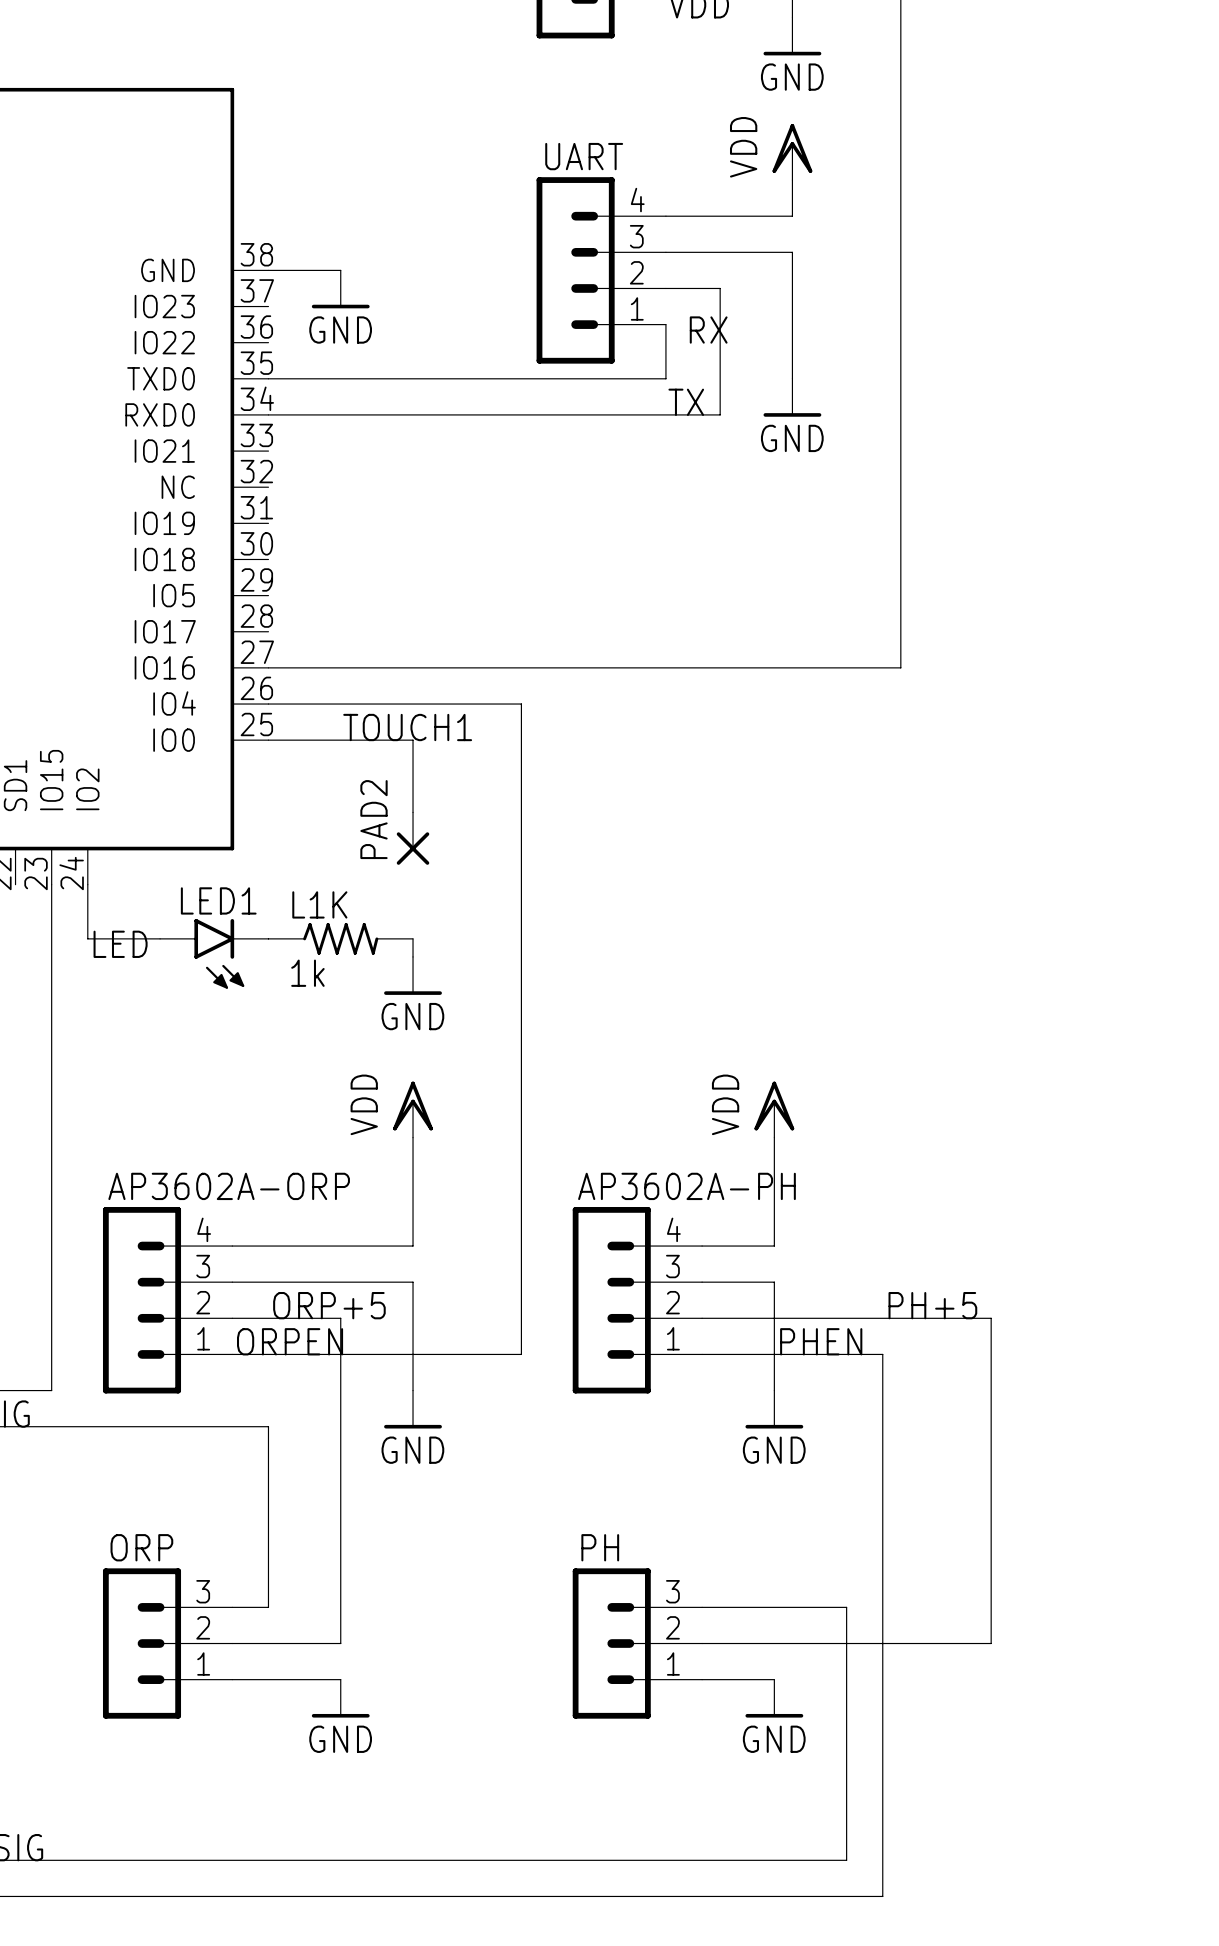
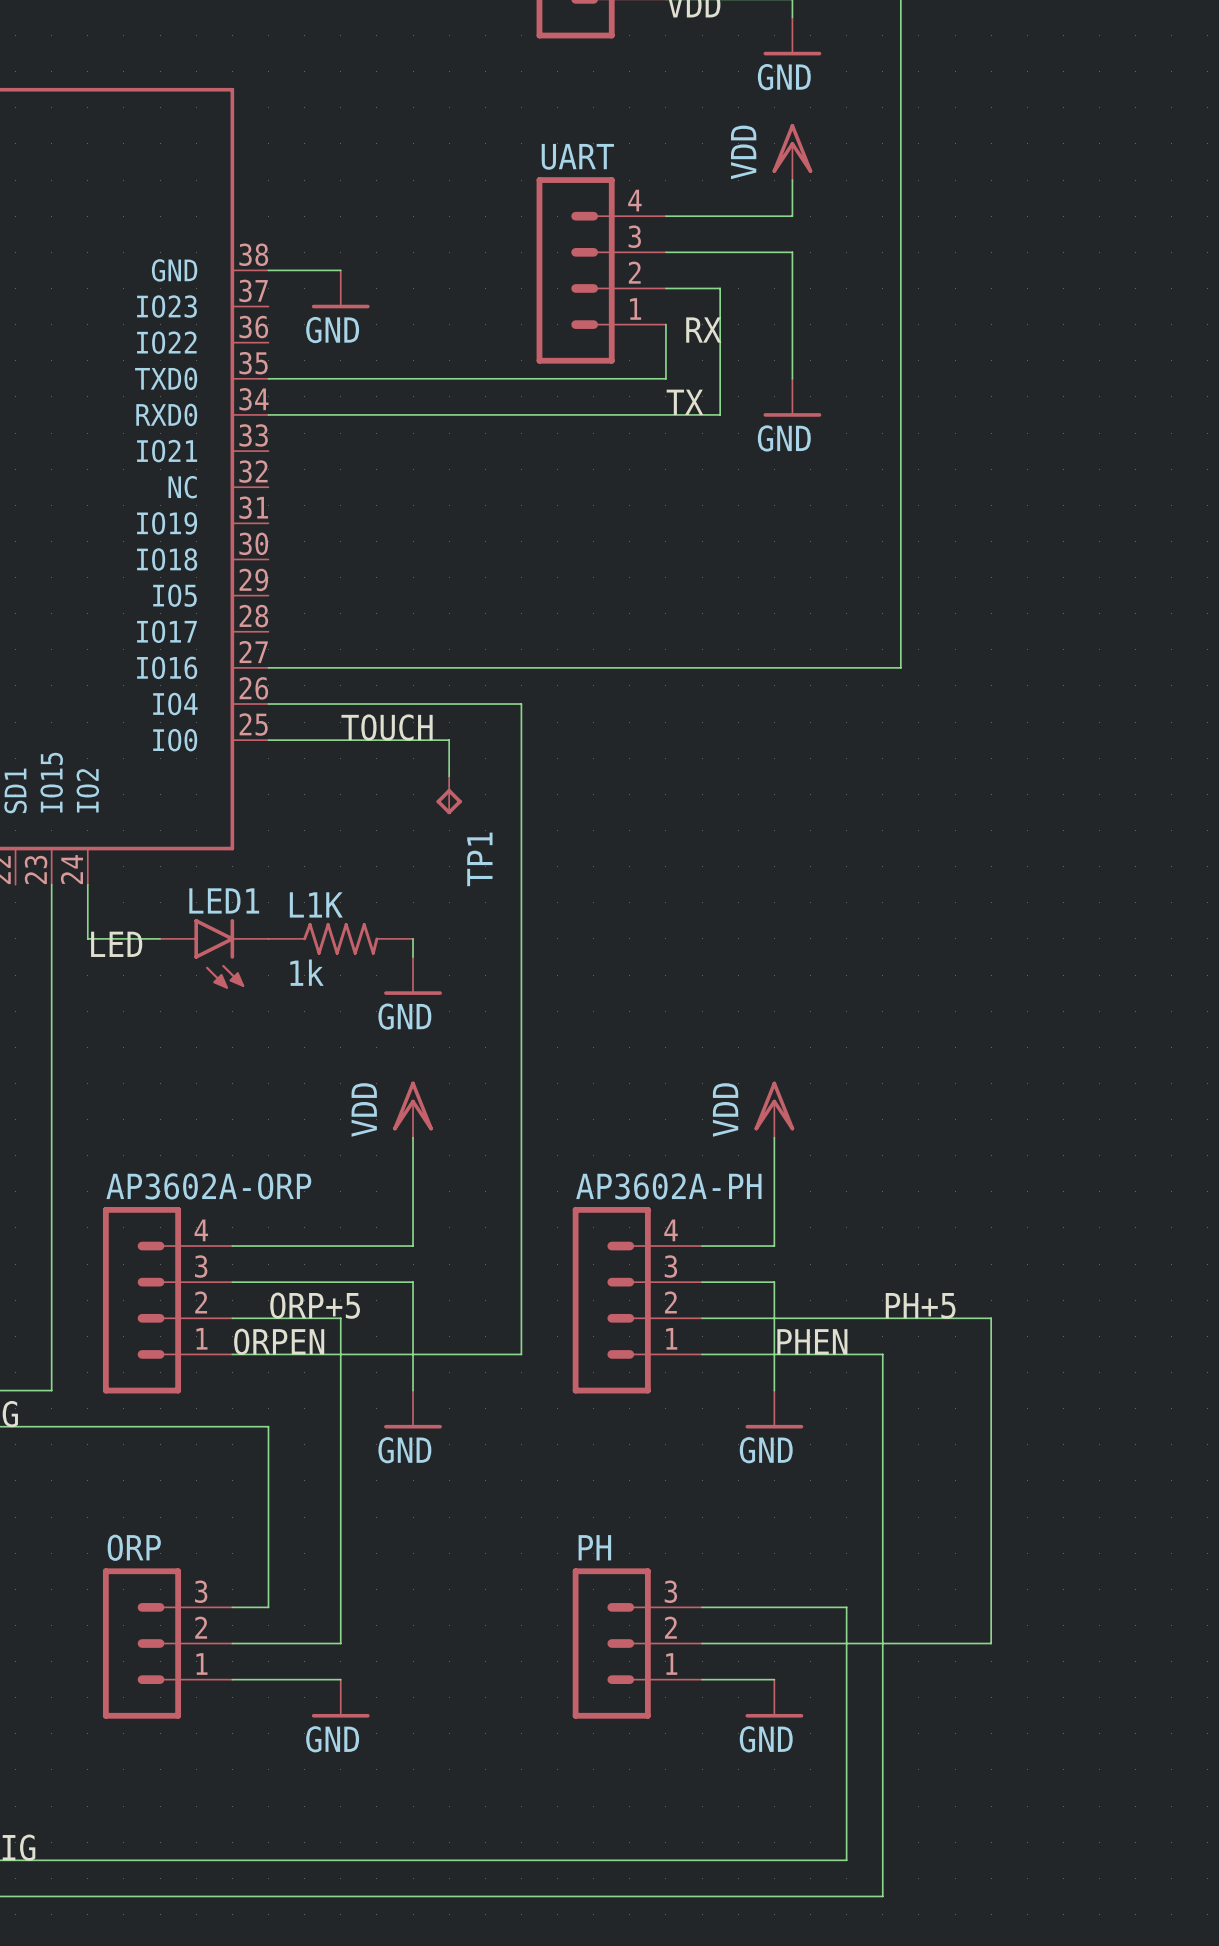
label: TOUCH1 (407, 727) -> TOUCH (387, 727)
wire: (413, 740) (413, 812) -> (413, 740) (449, 740) (449, 776)
TP1: none -> (449, 795)
PAD2: (413, 838) -> none

